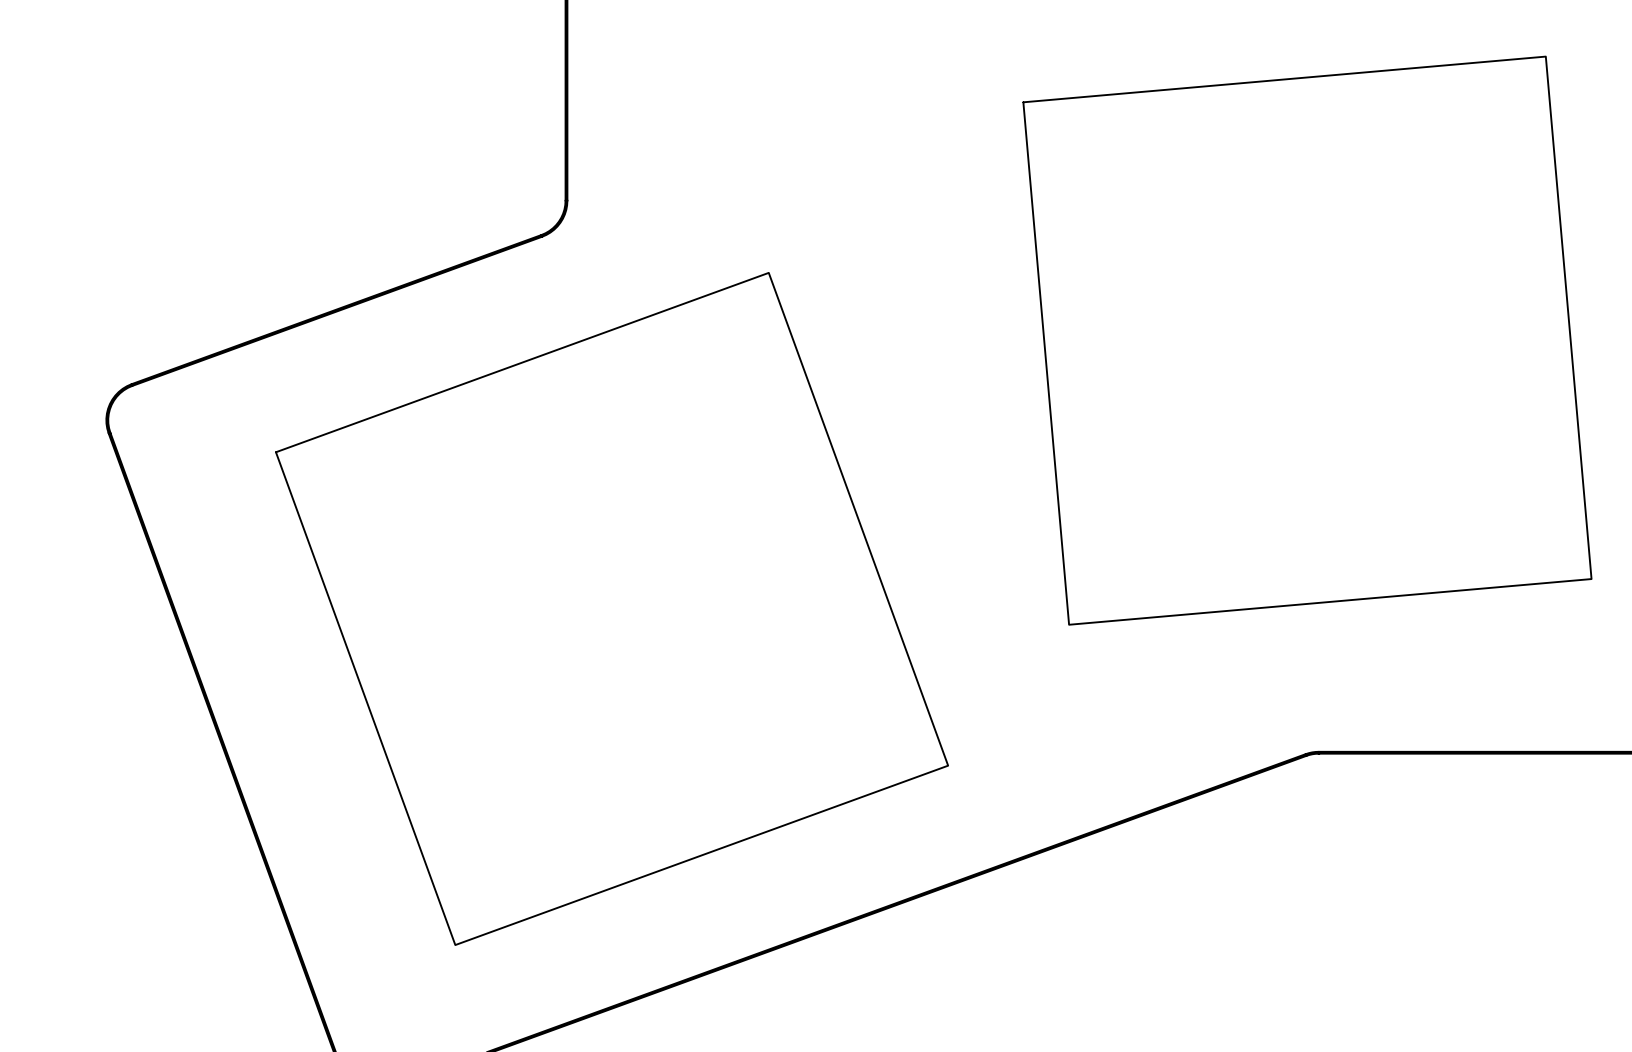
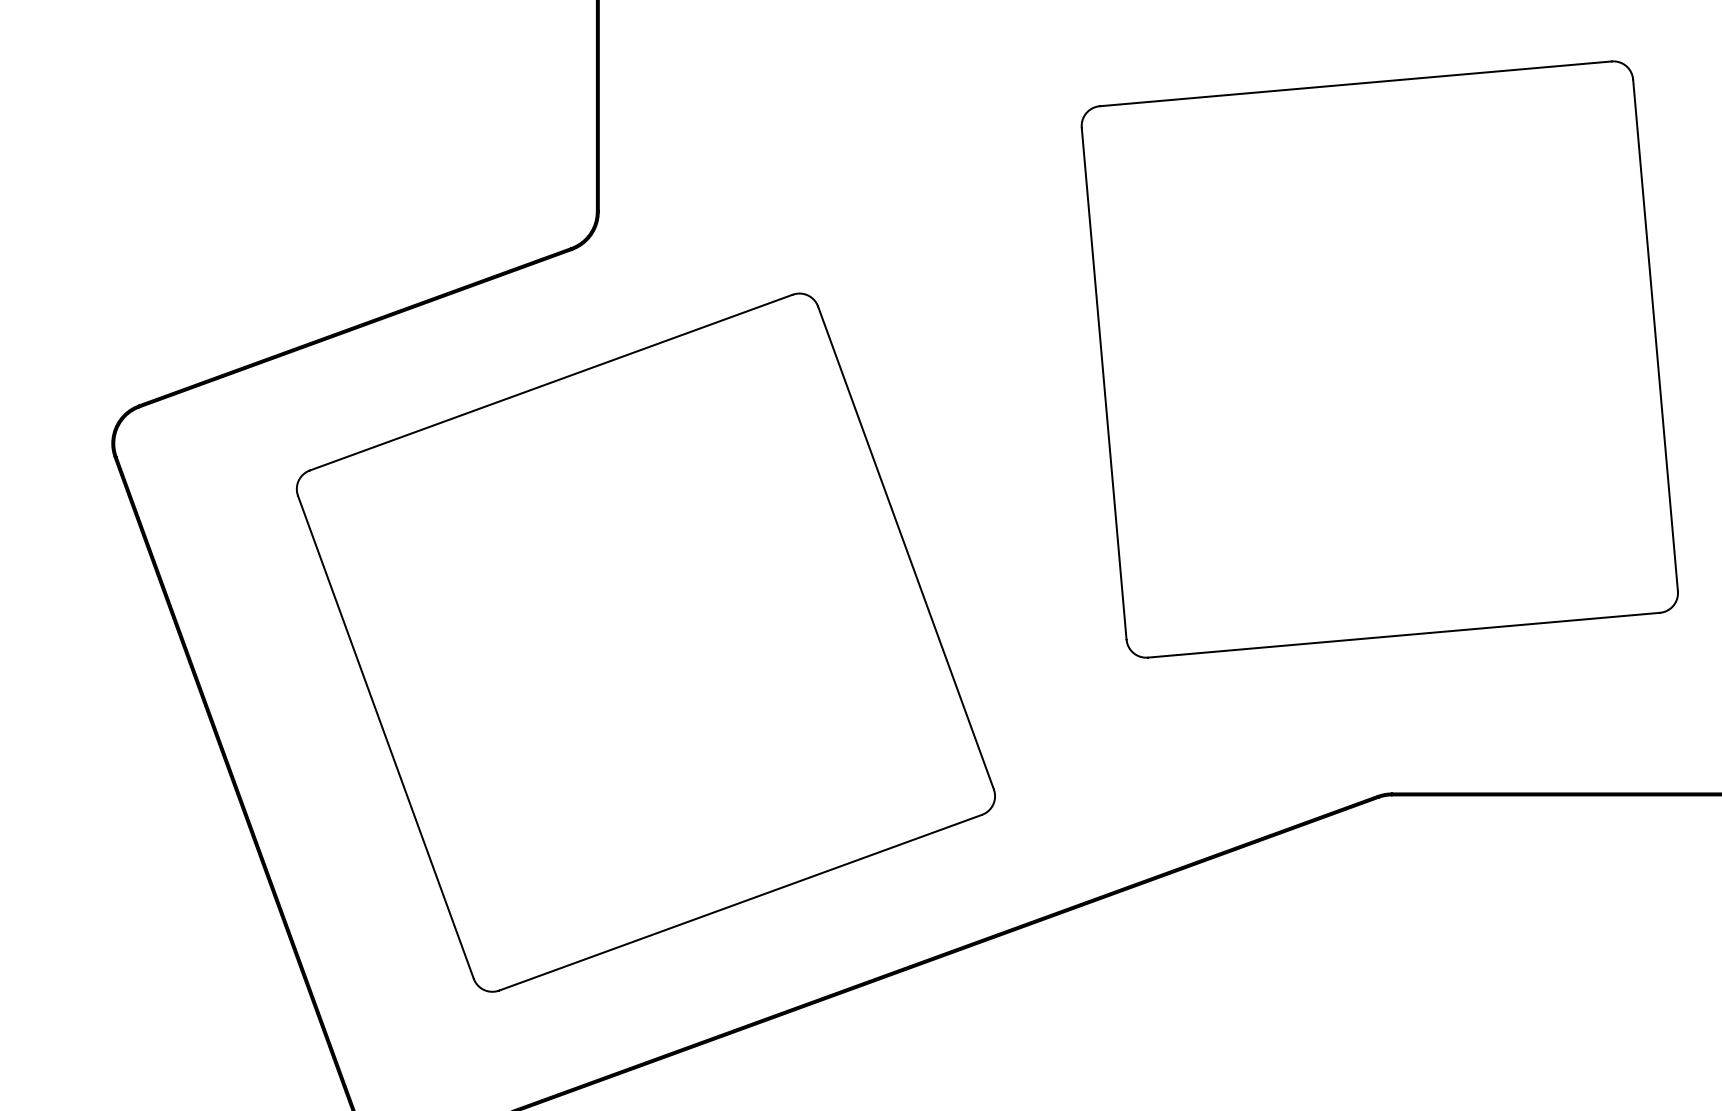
drawing shape: [1022, 55, 1593, 626] -> [1080, 60, 1679, 659]
drawing shape: [275, 271, 950, 947] -> [295, 292, 997, 993]

